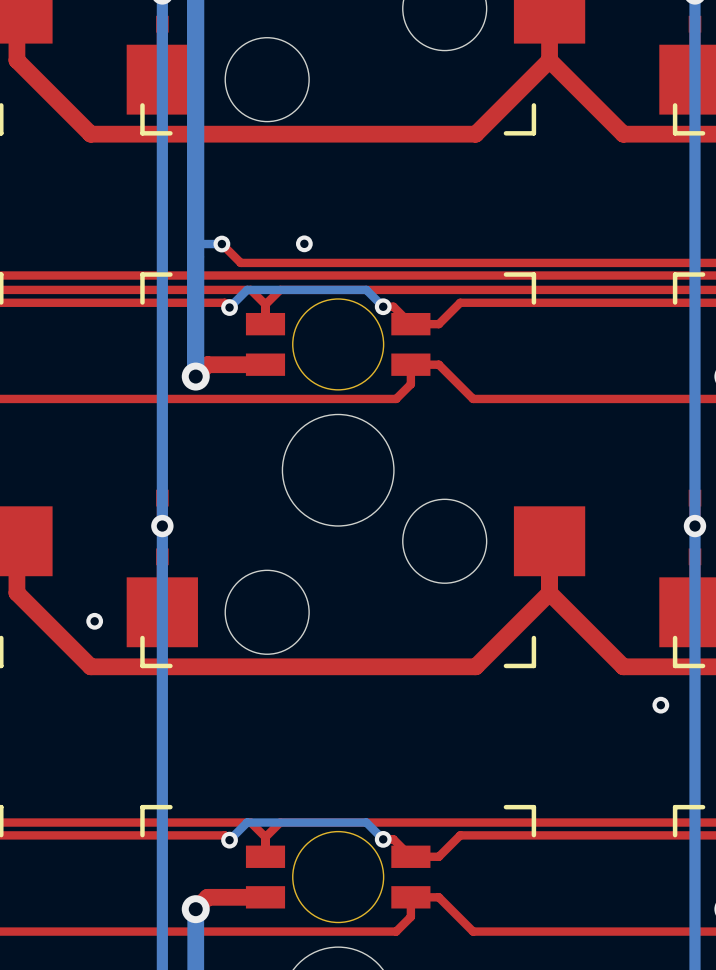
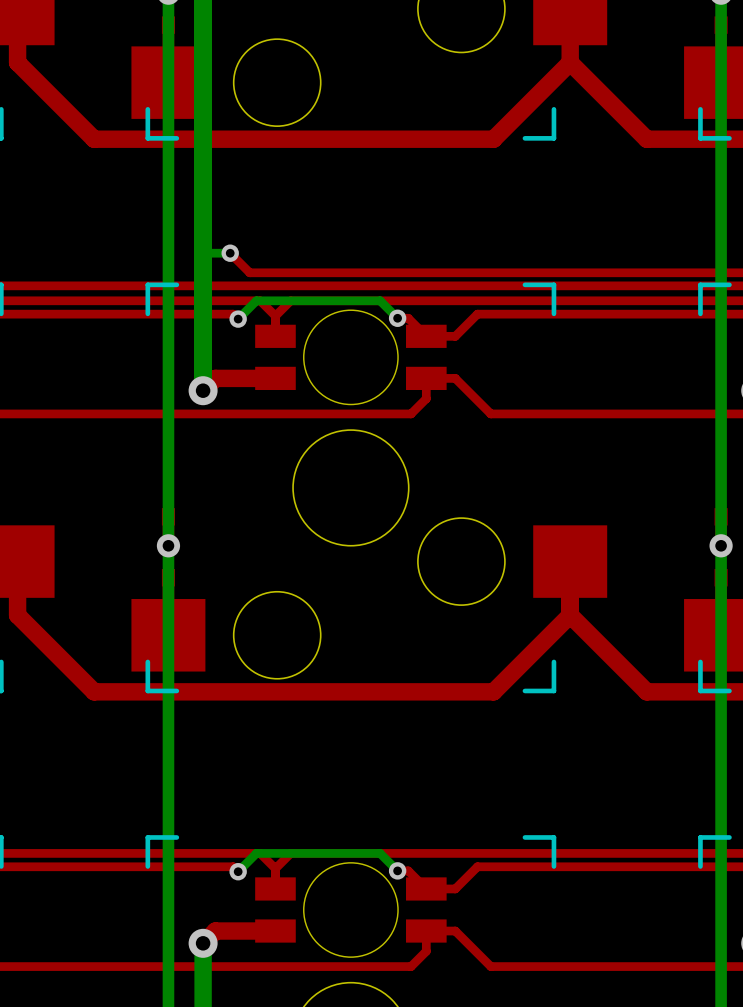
via: (304, 243) -> none
via: (94, 621) -> none
via: (660, 705) -> none

